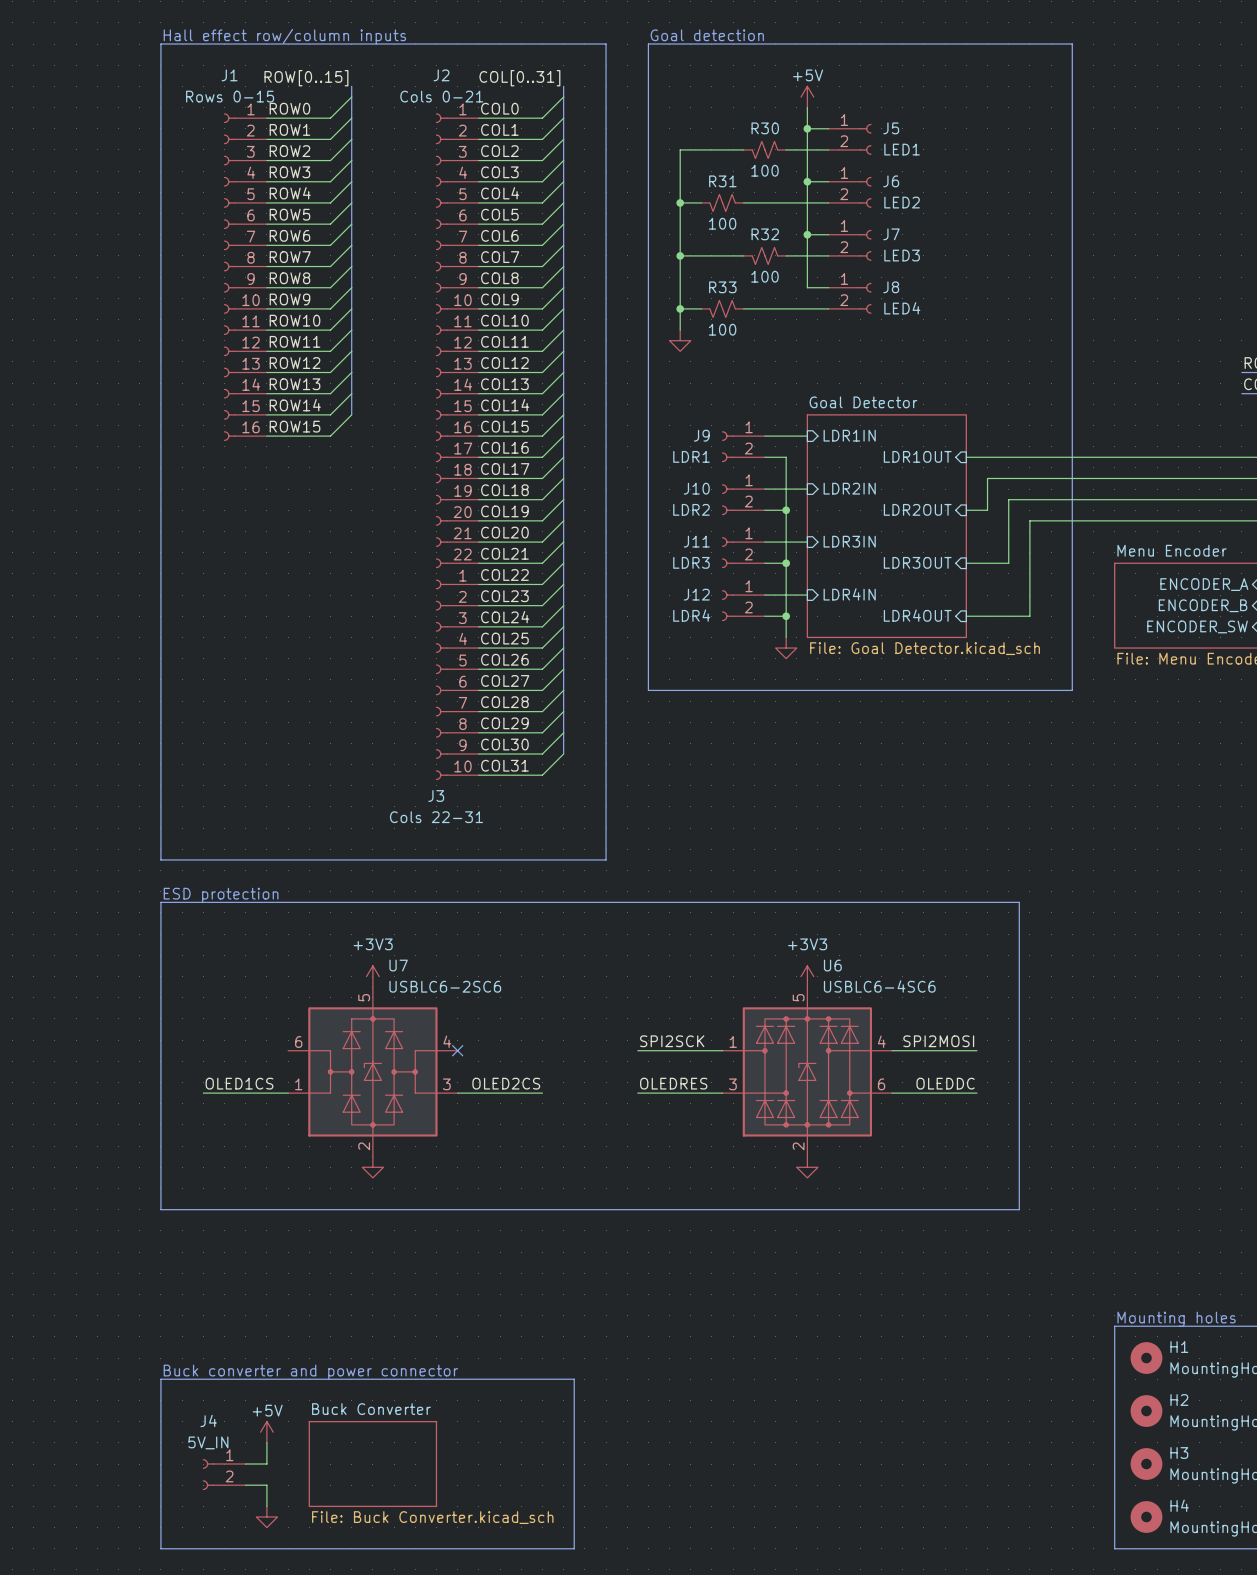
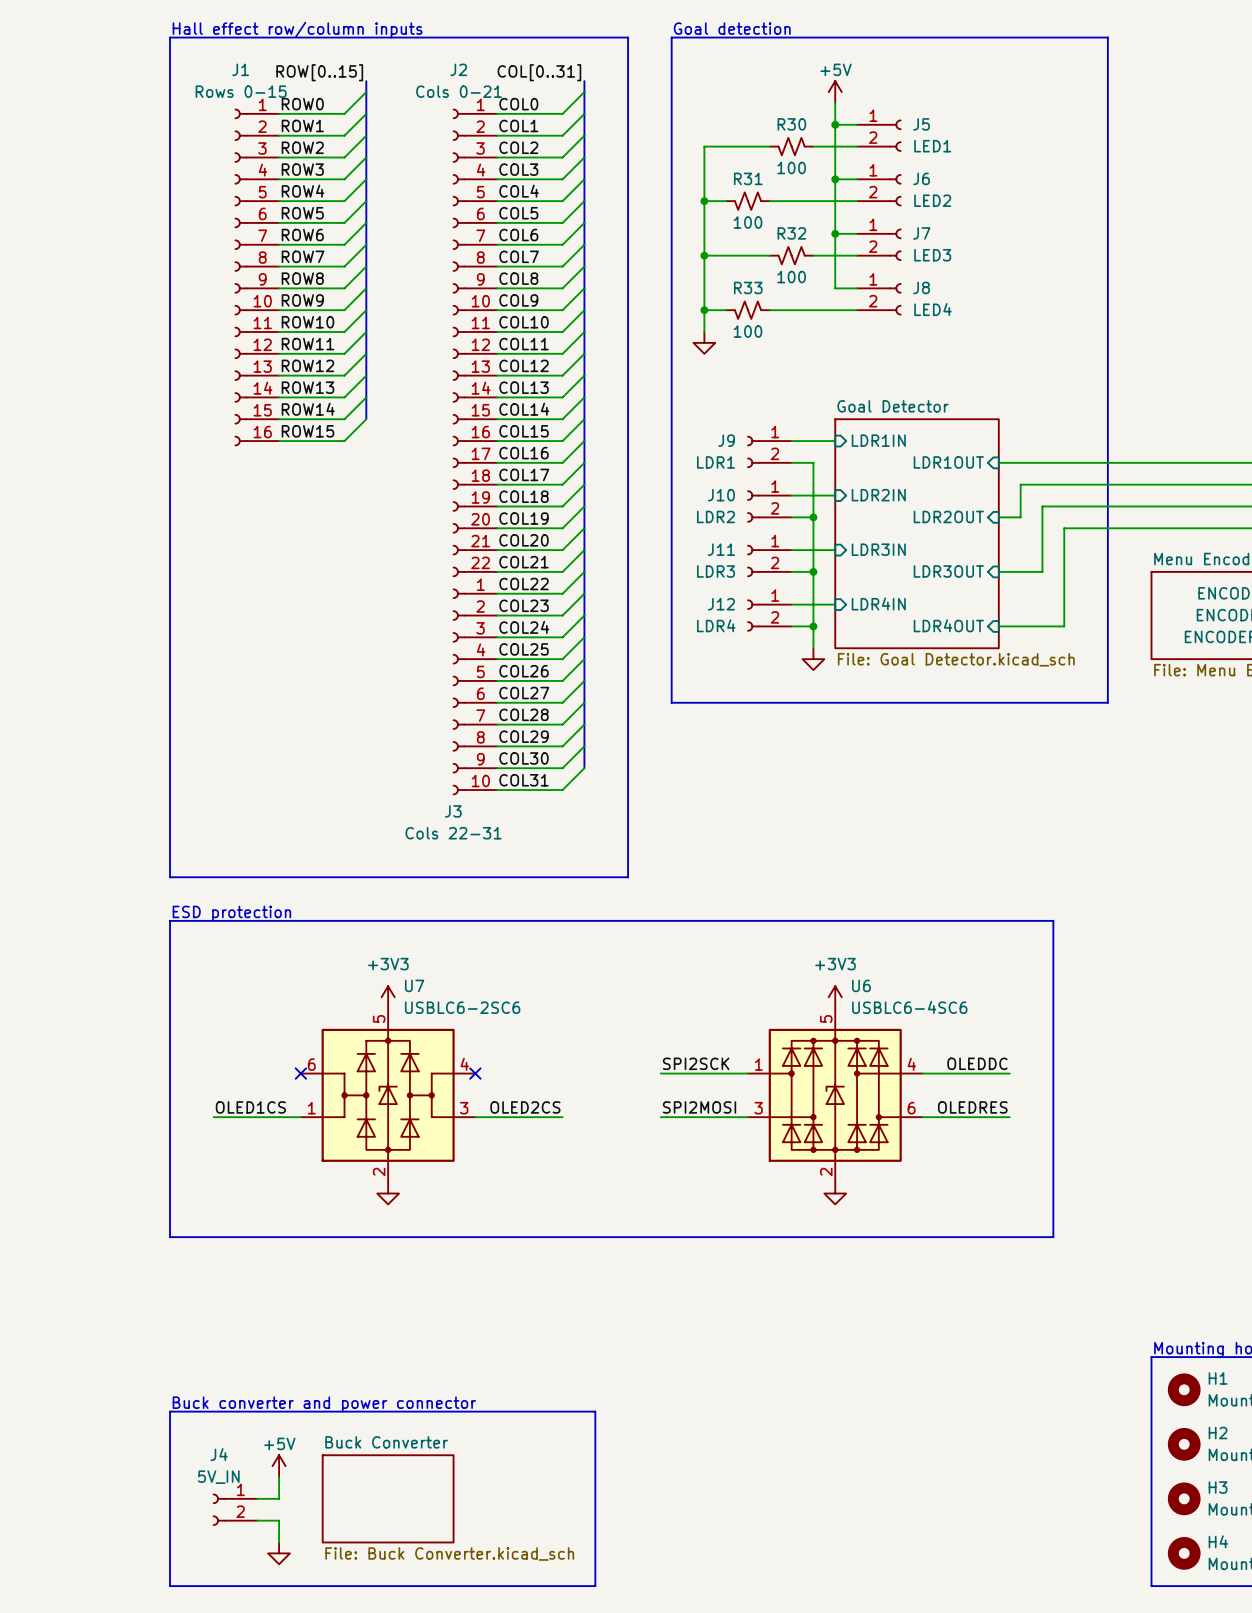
label: SPI2MOSI (938, 1041) -> OLEDDC (977, 1063)
no-connect mark: none -> (300, 1073)
label: OLEDRES (673, 1083) -> SPI2MOSI (699, 1107)
label: OLEDDC (945, 1083) -> OLEDRES (972, 1107)

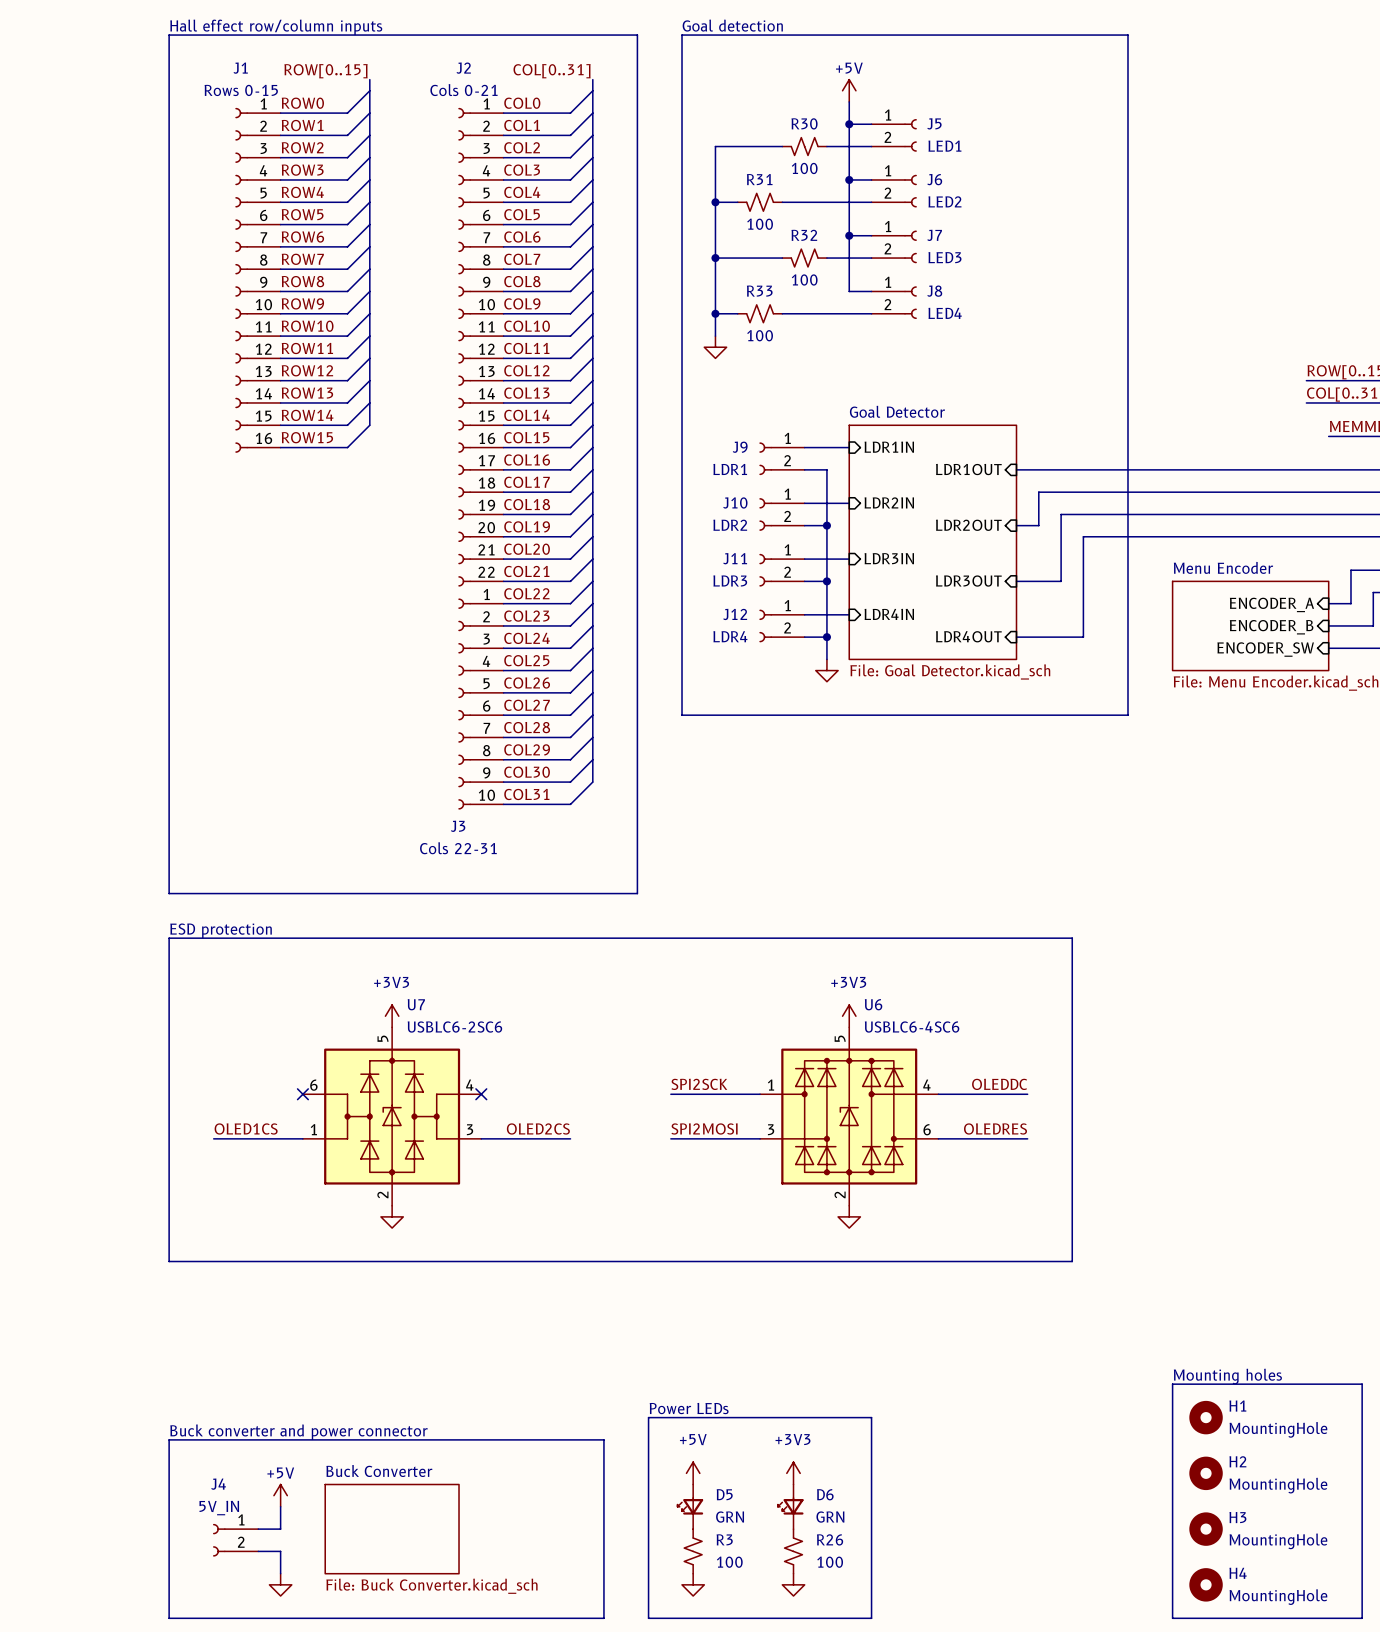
text: none -> Power LEDs (689, 1408)
line: none -> (648, 1417) (871, 1417) (871, 1618) (648, 1618) (648, 1417)
power symbol: none -> +5V (693, 1473)
power symbol: none -> +3V3 (793, 1473)
D5: none -> GRN (690, 1506)
D6: none -> GRN (790, 1506)
R3: none -> 100 (693, 1551)
R26: none -> 100 (793, 1551)
power symbol: none -> (693, 1584)
power symbol: none -> (793, 1584)

